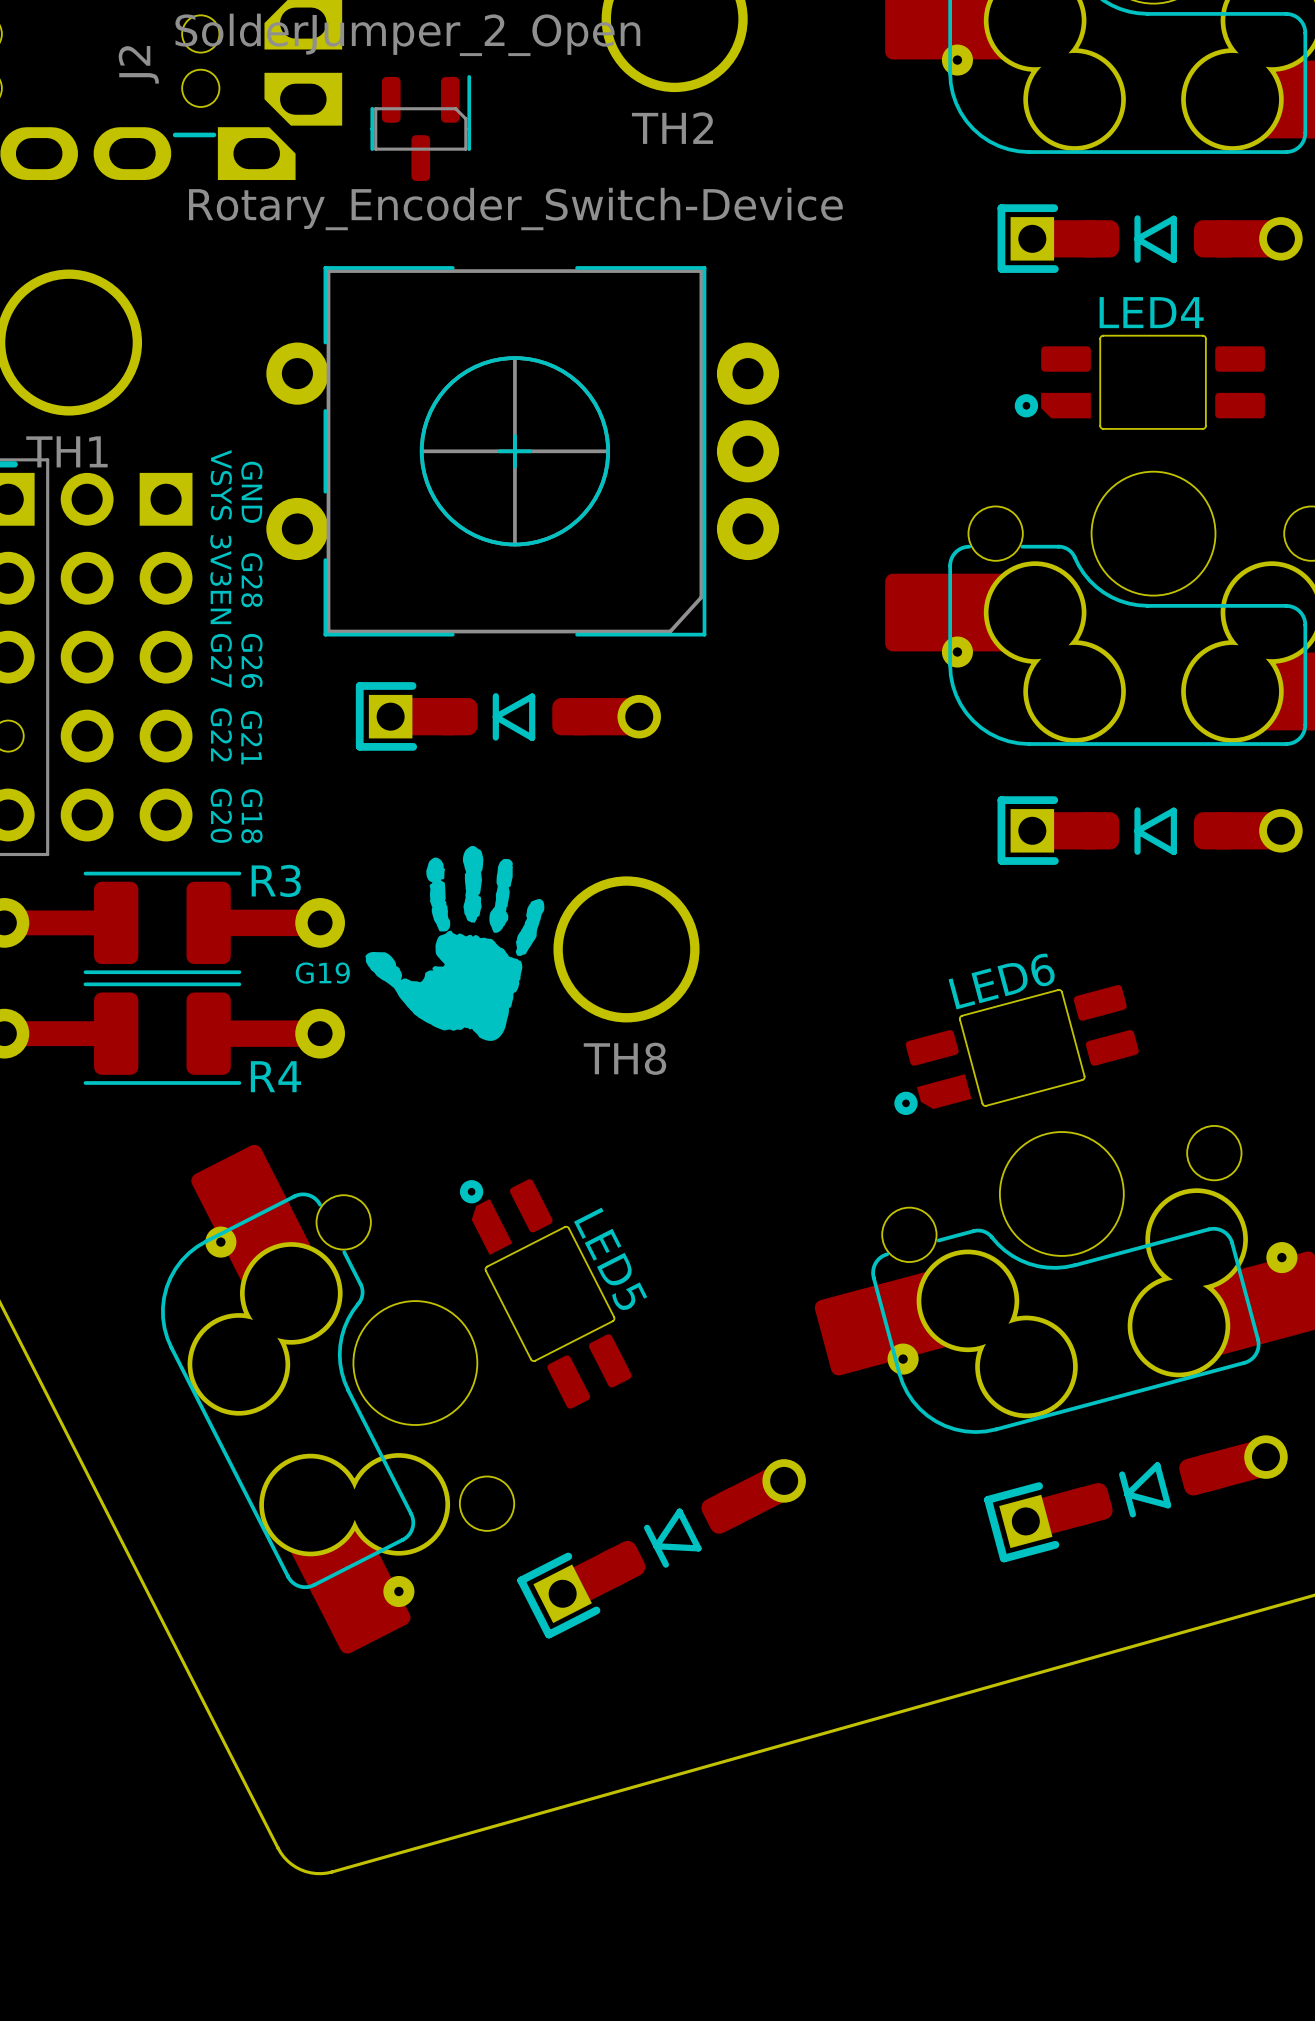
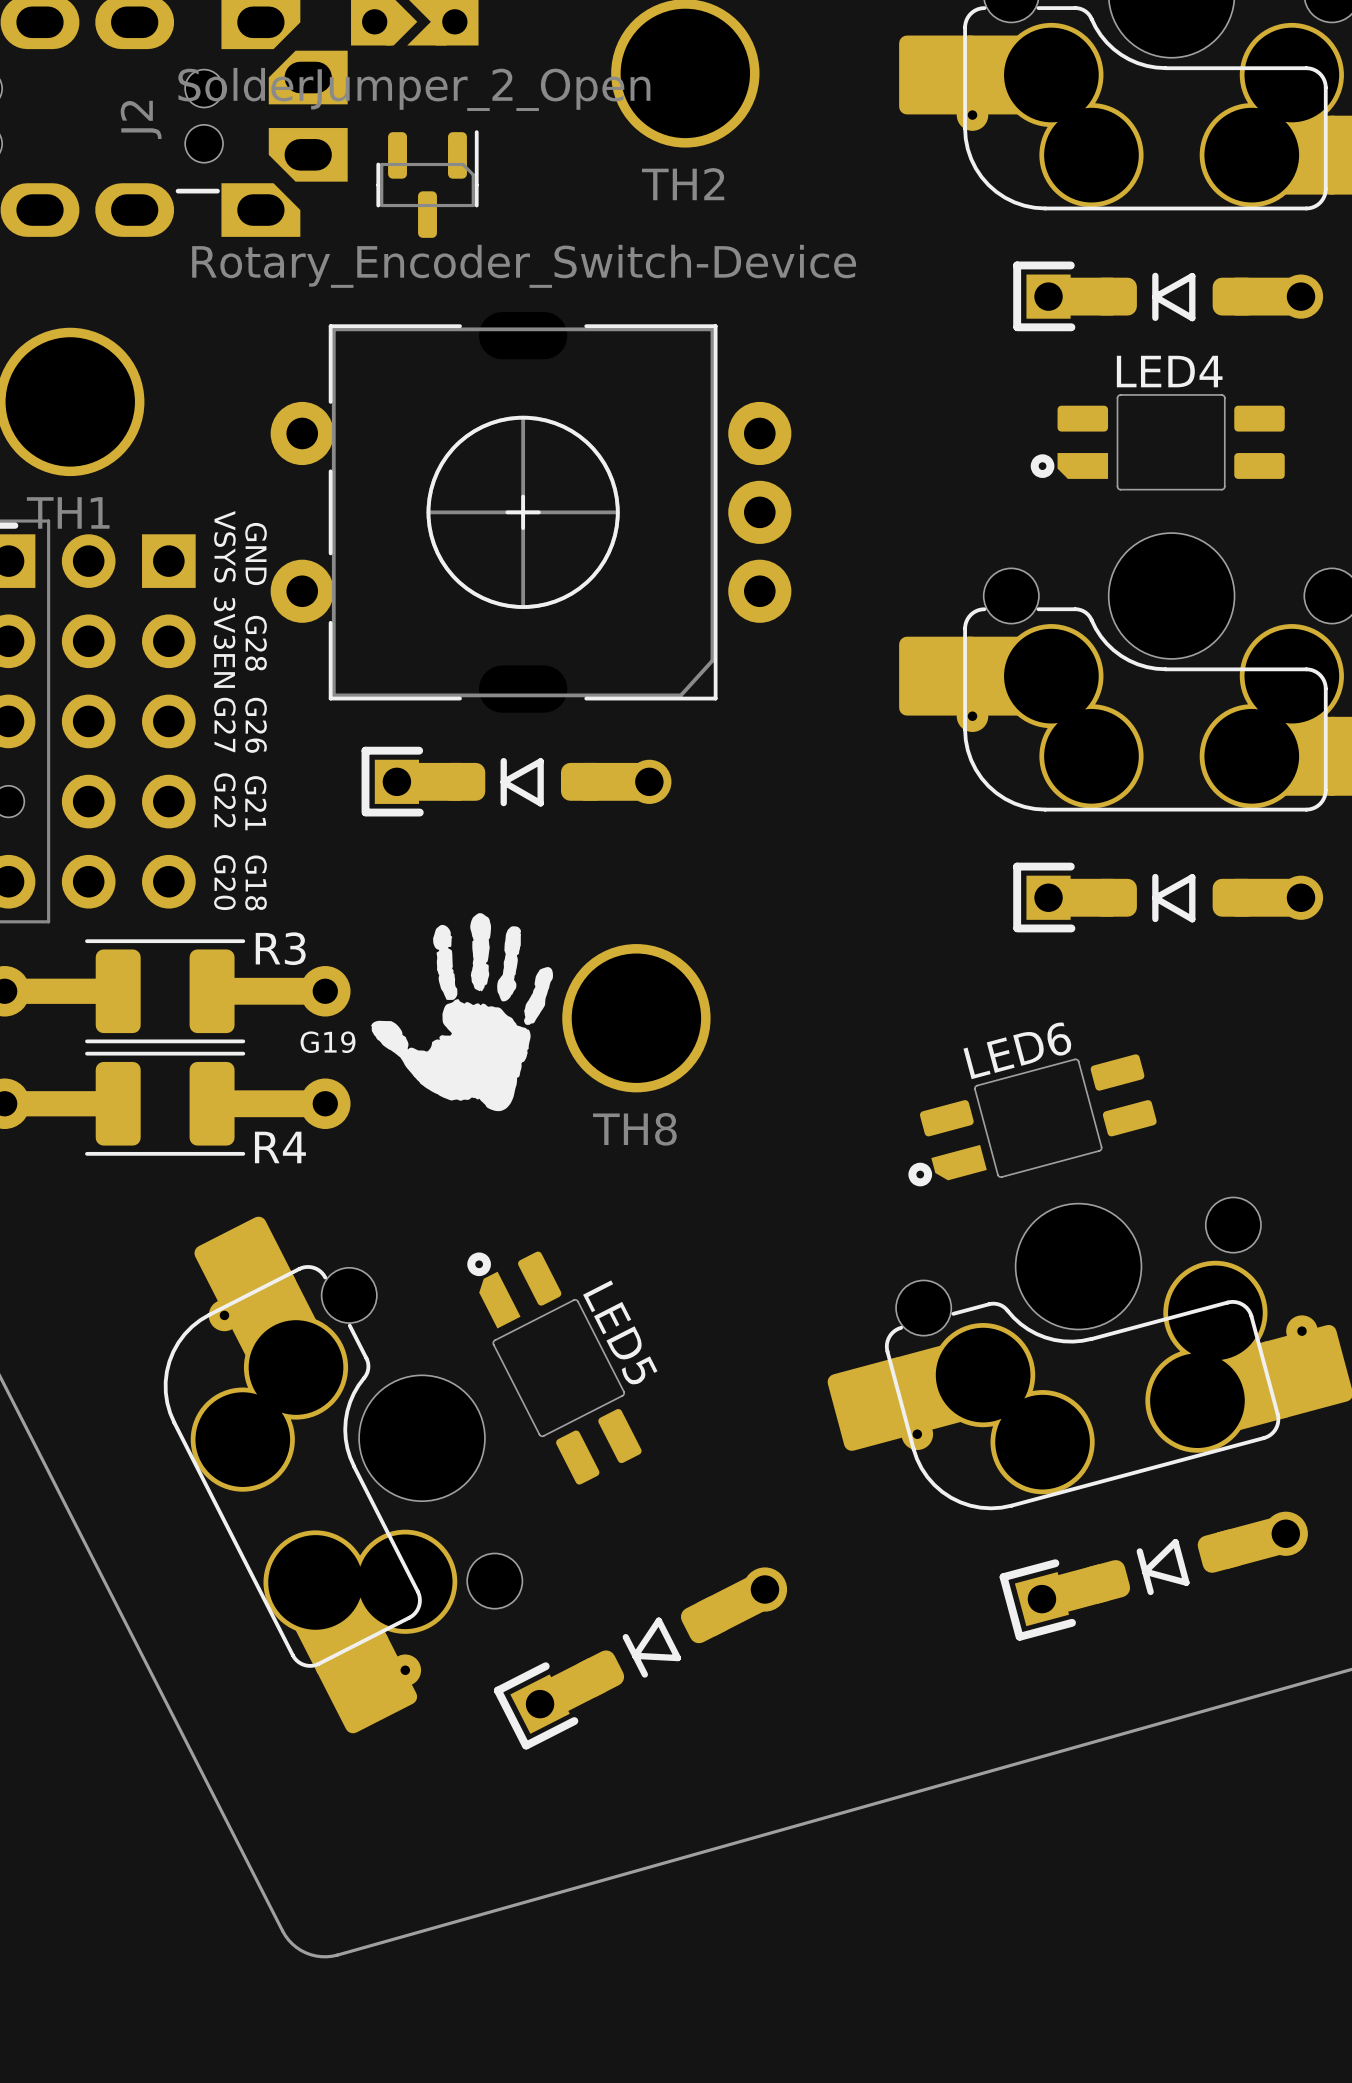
part position: (661, 1548) -> (640, 1658)

